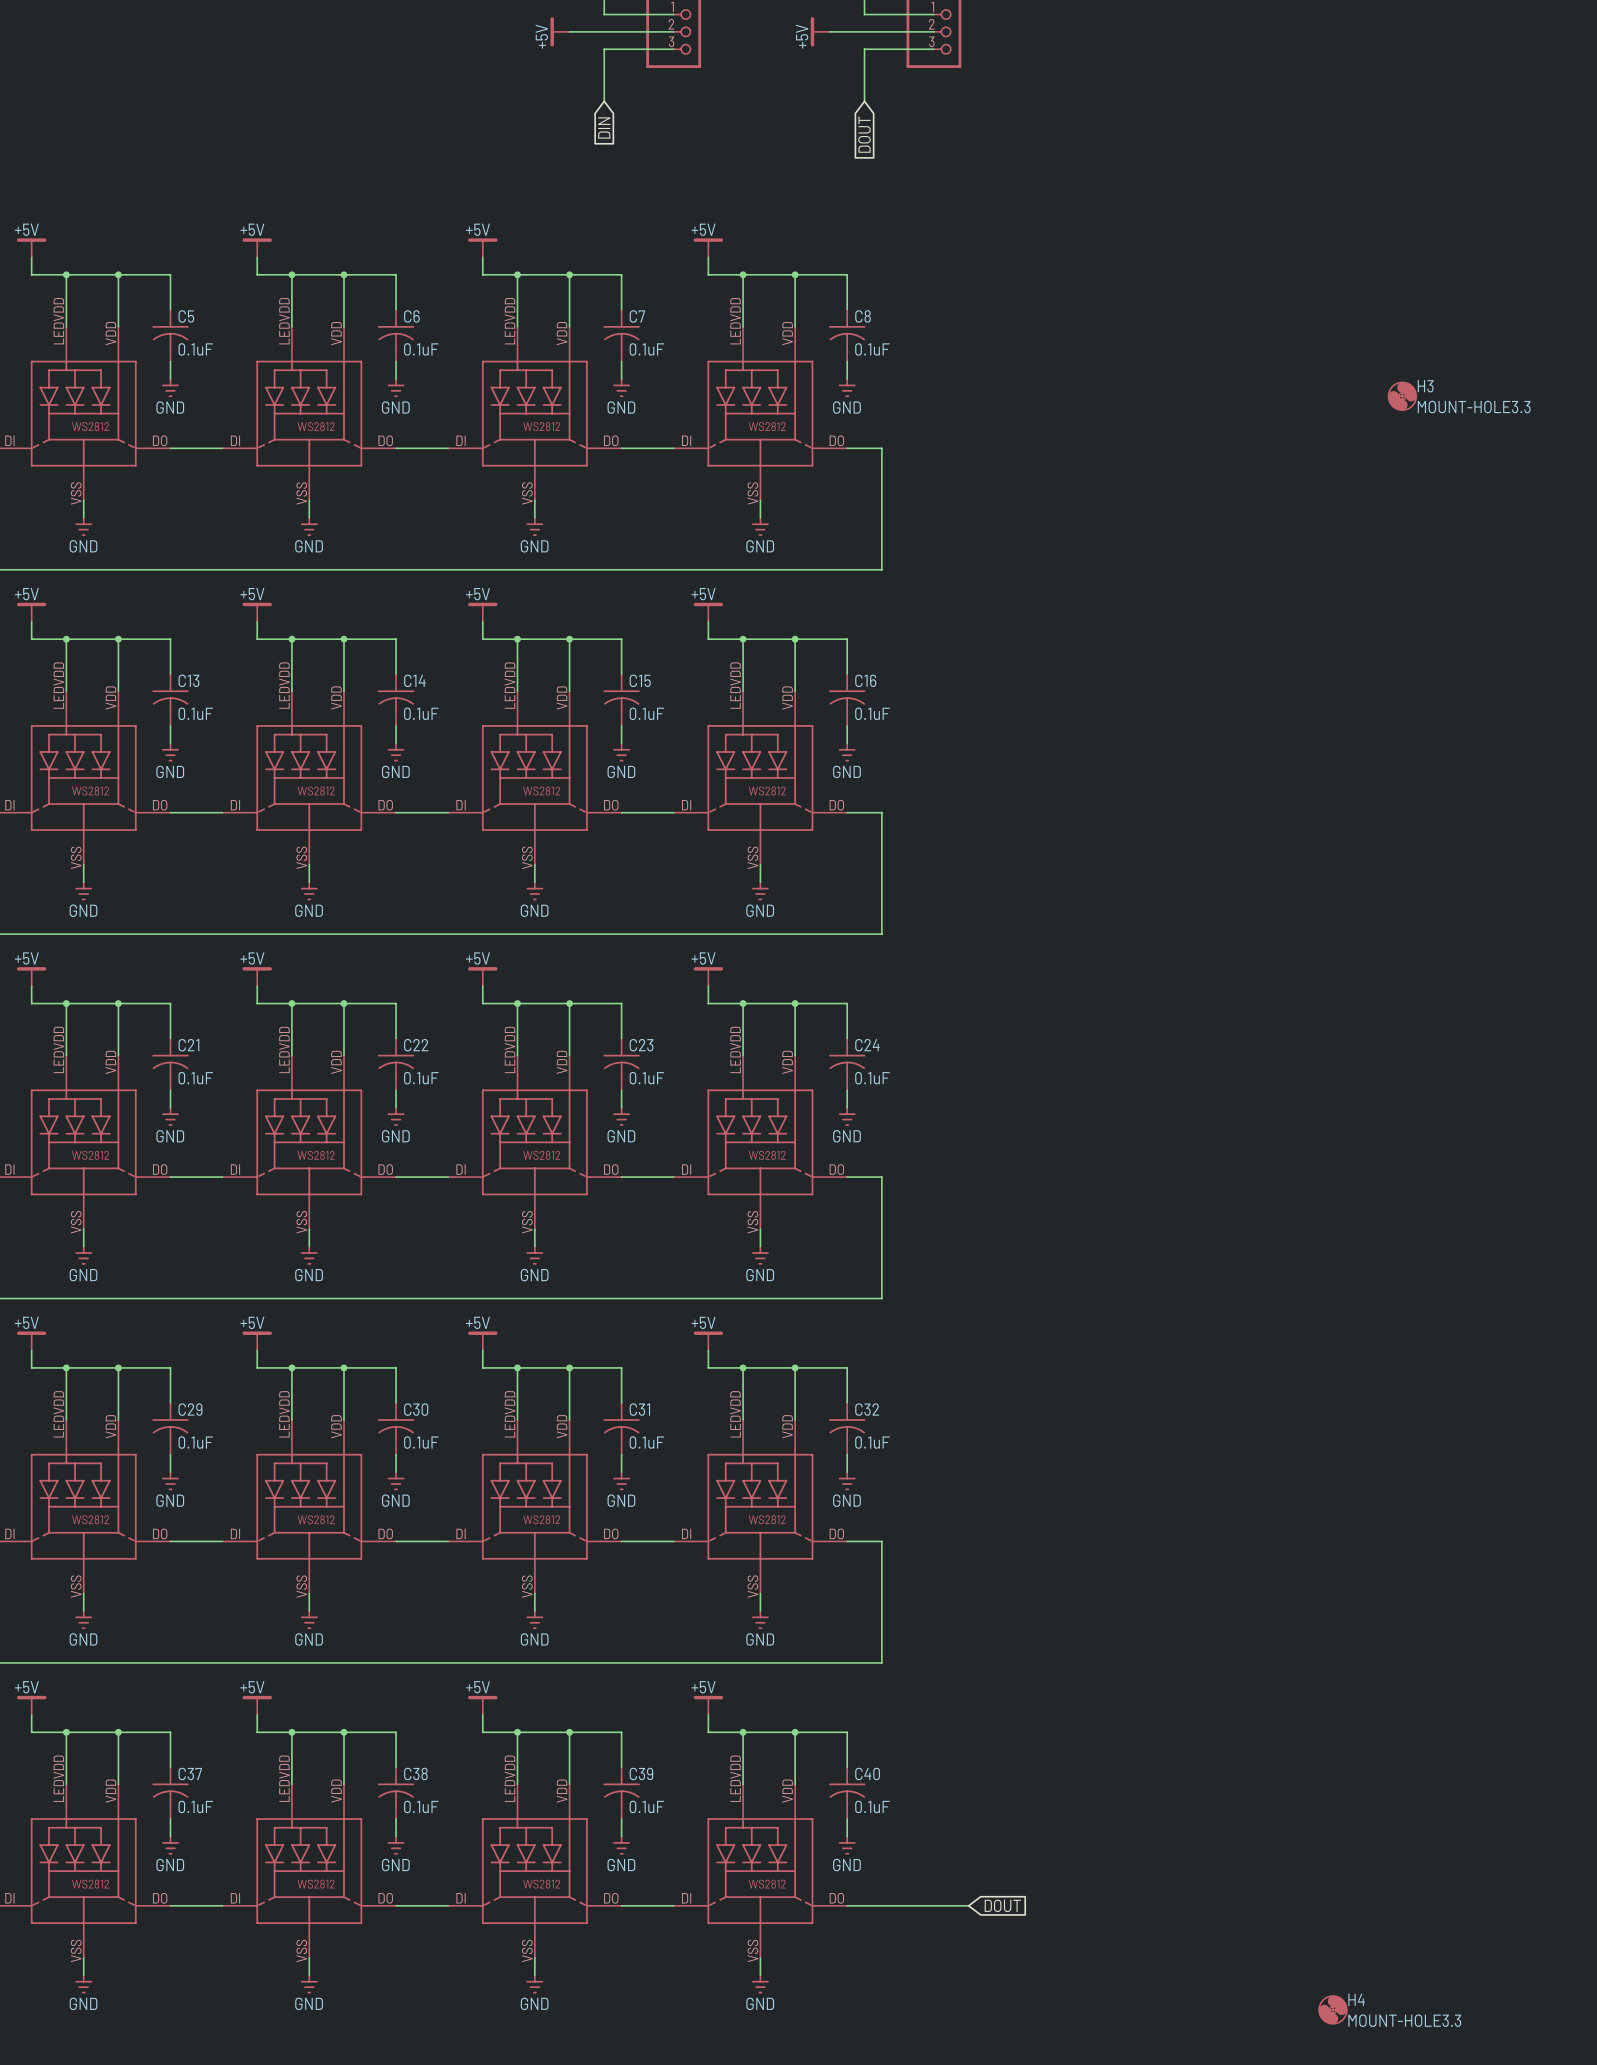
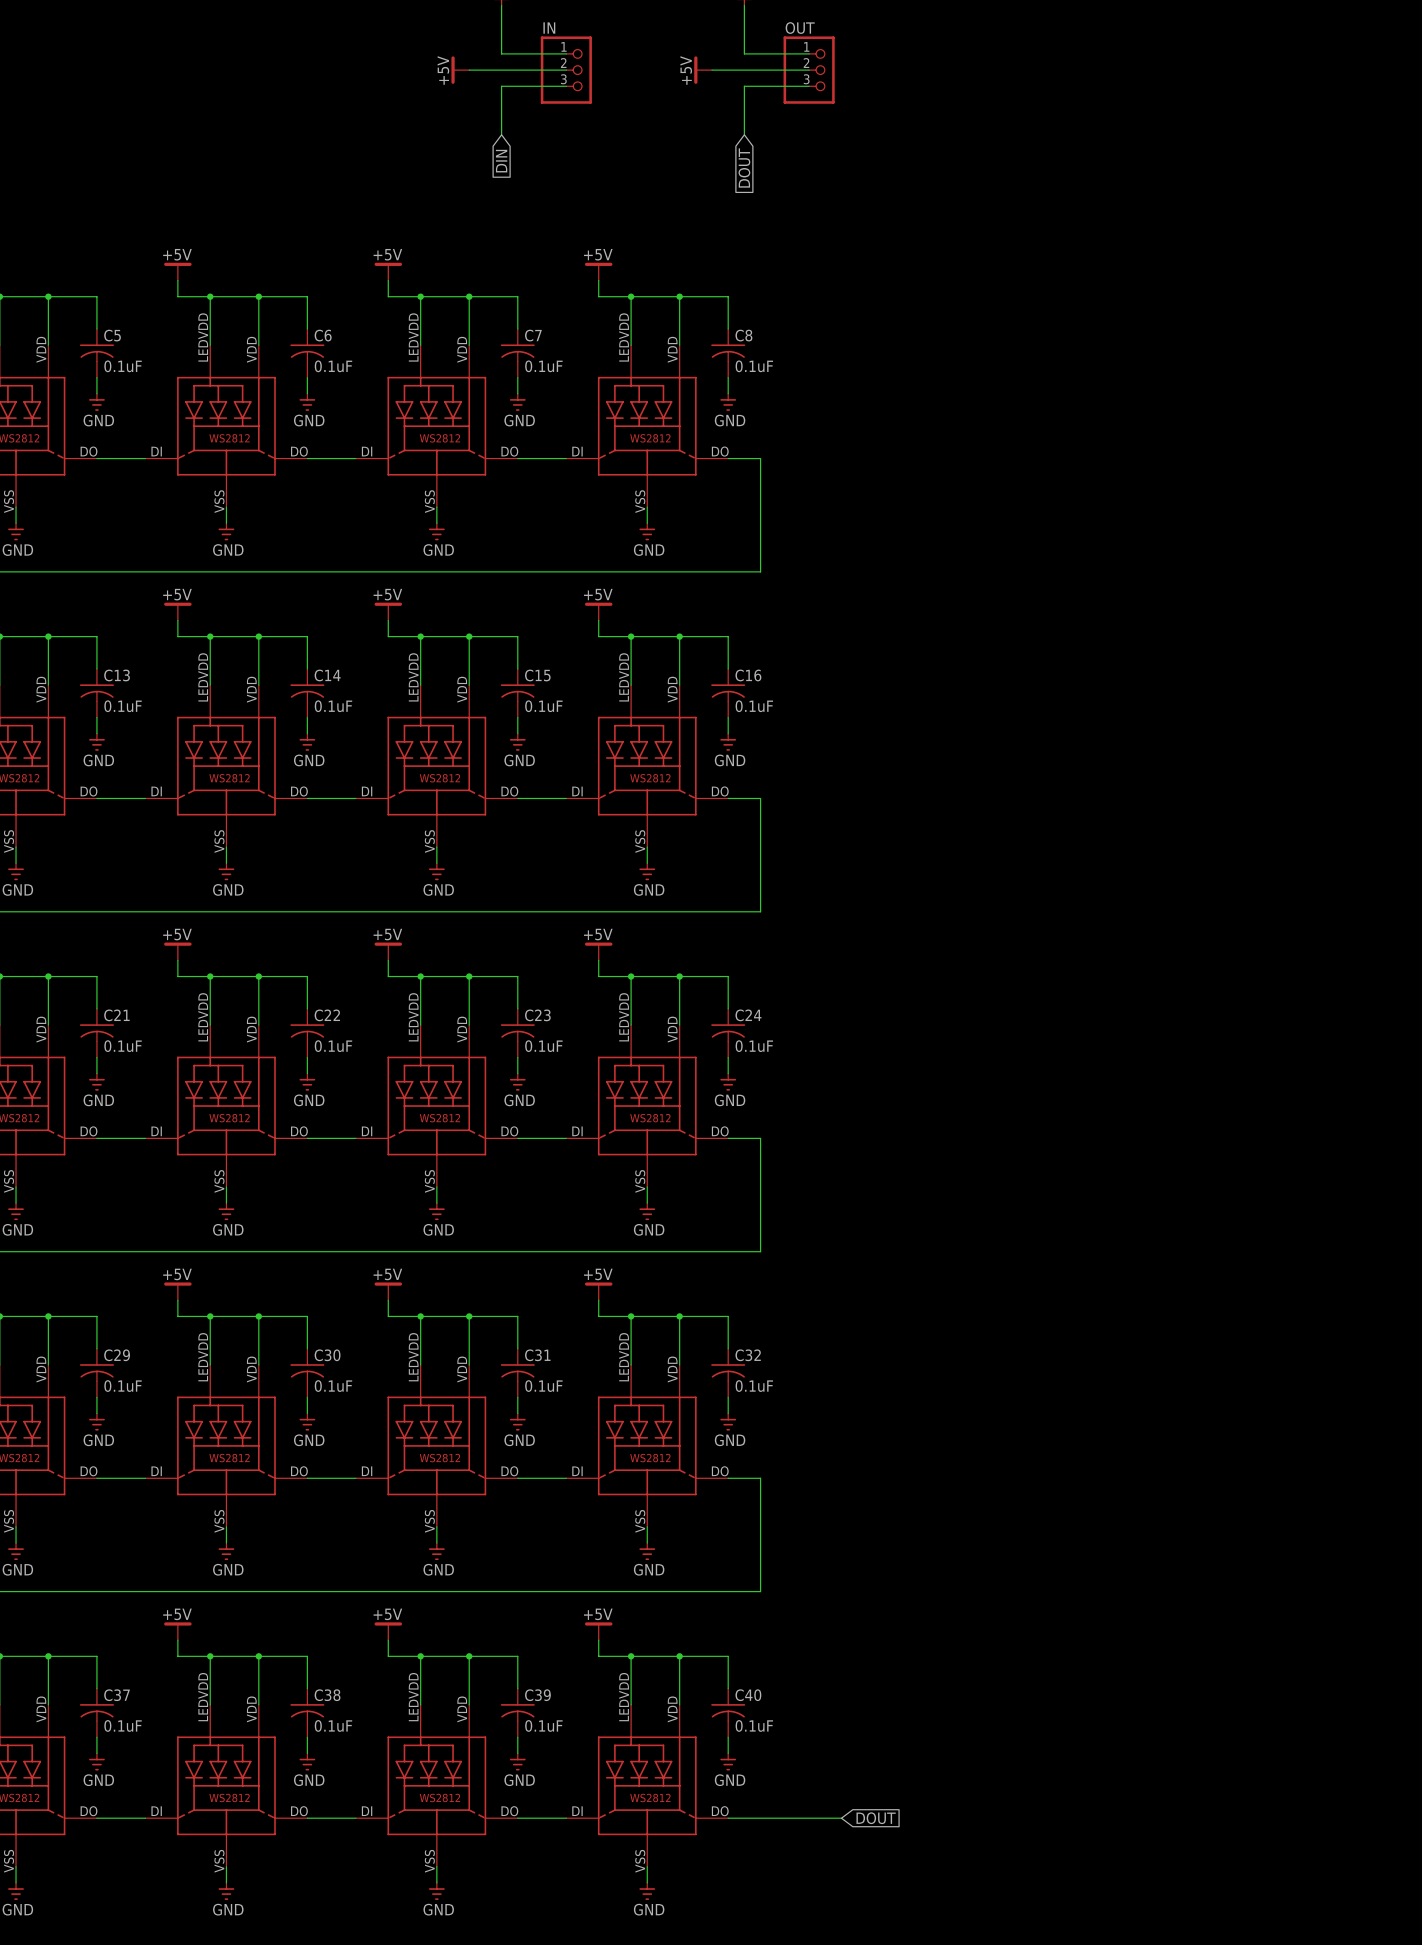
H3: MOUNT-HOLE3.3 (1402, 396) -> none
H4: MOUNT-HOLE3.3 (1333, 2009) -> none

